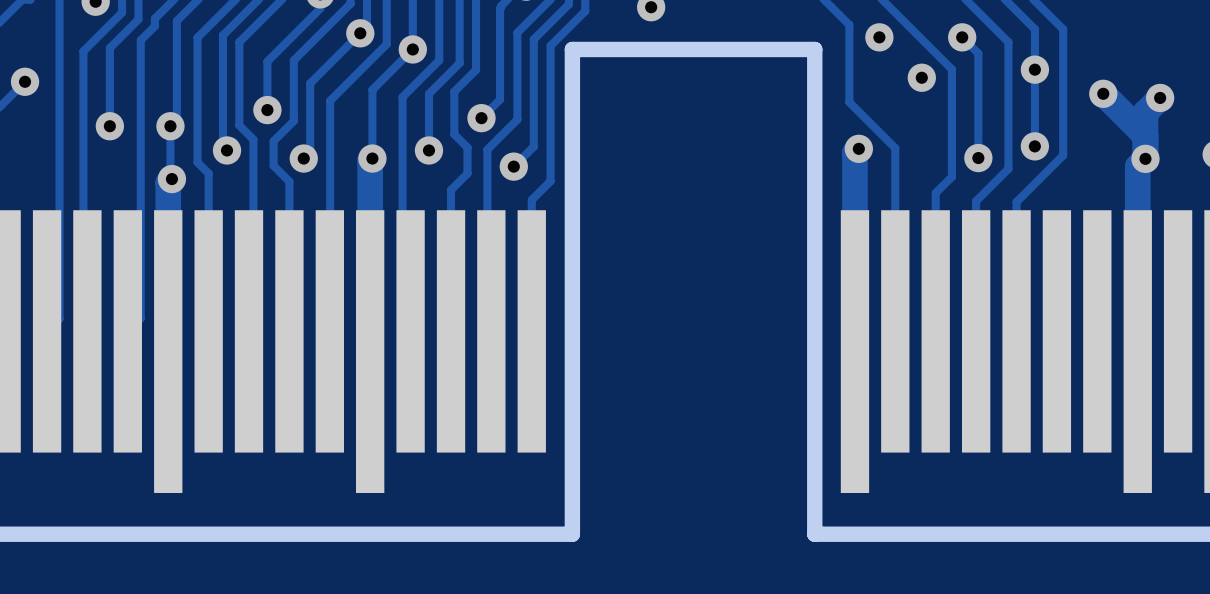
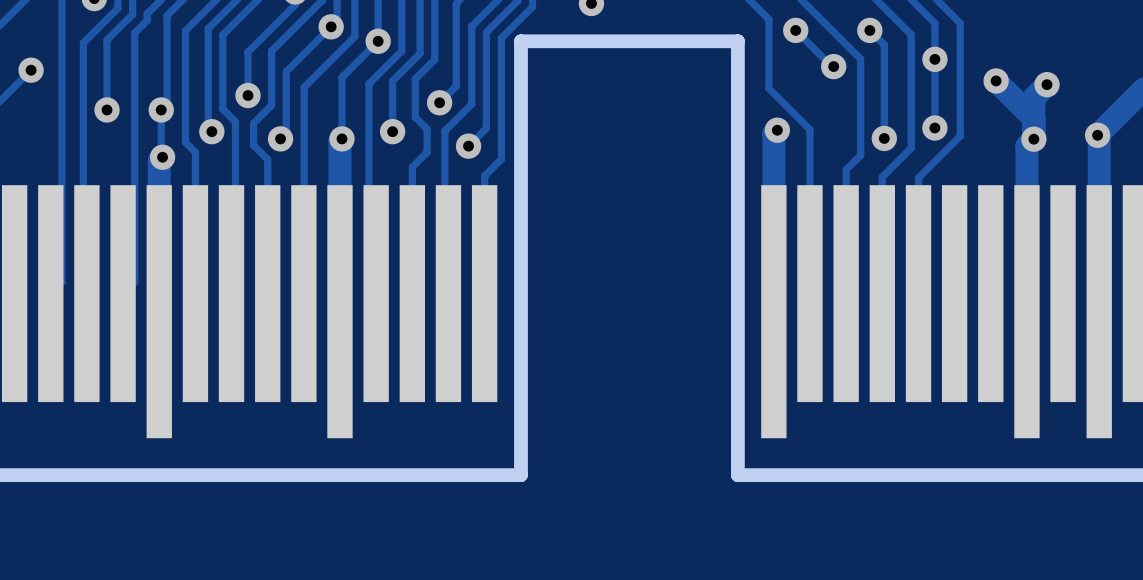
track: none -> (795, 30) (831, 66)

